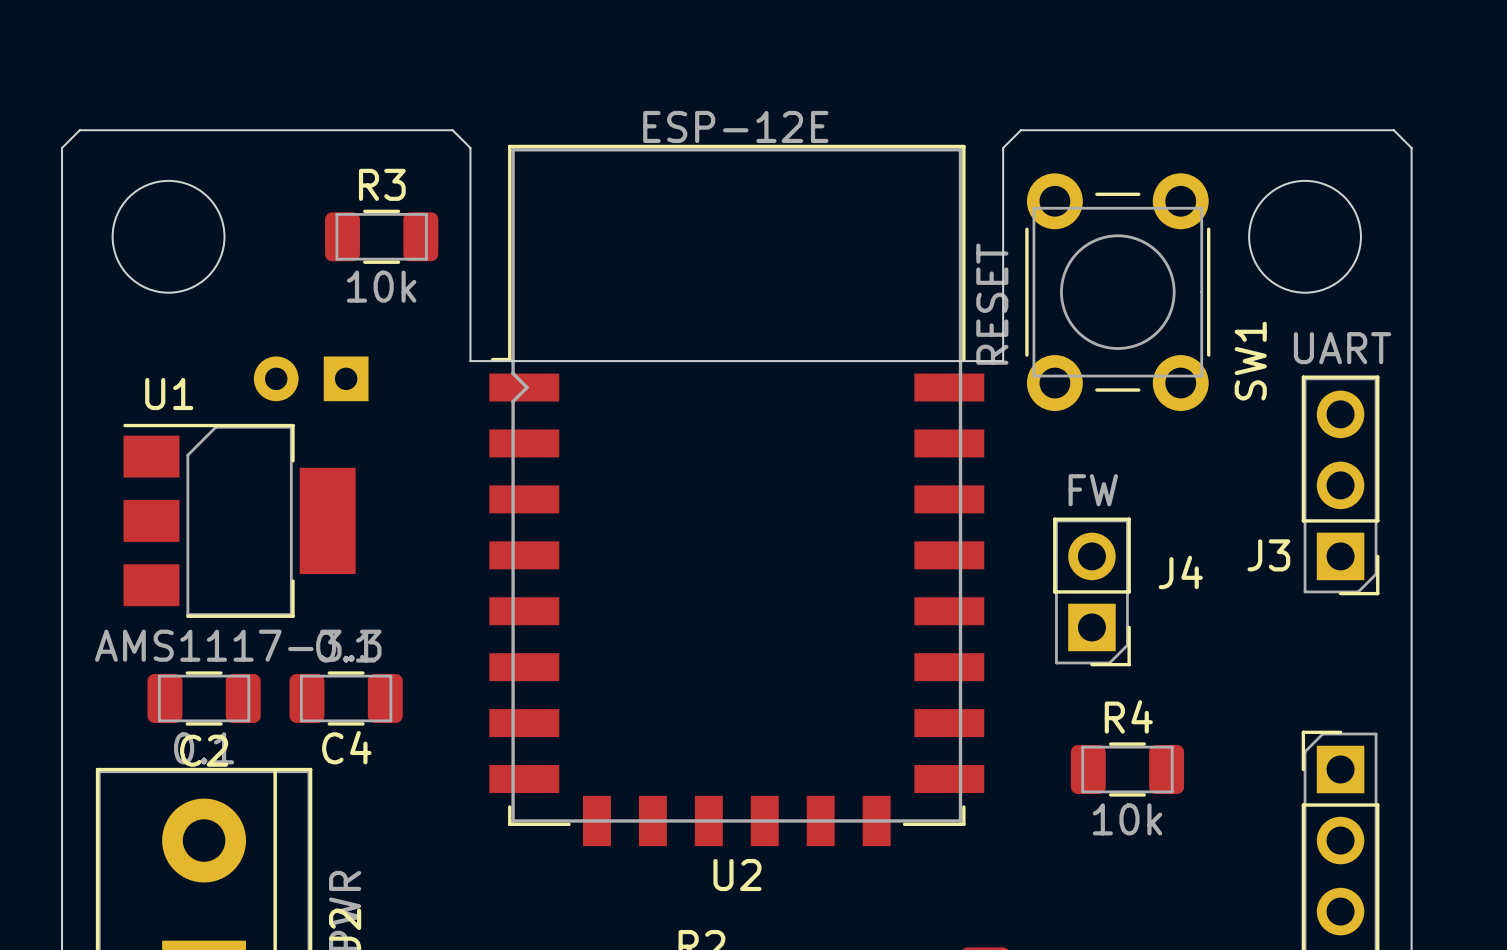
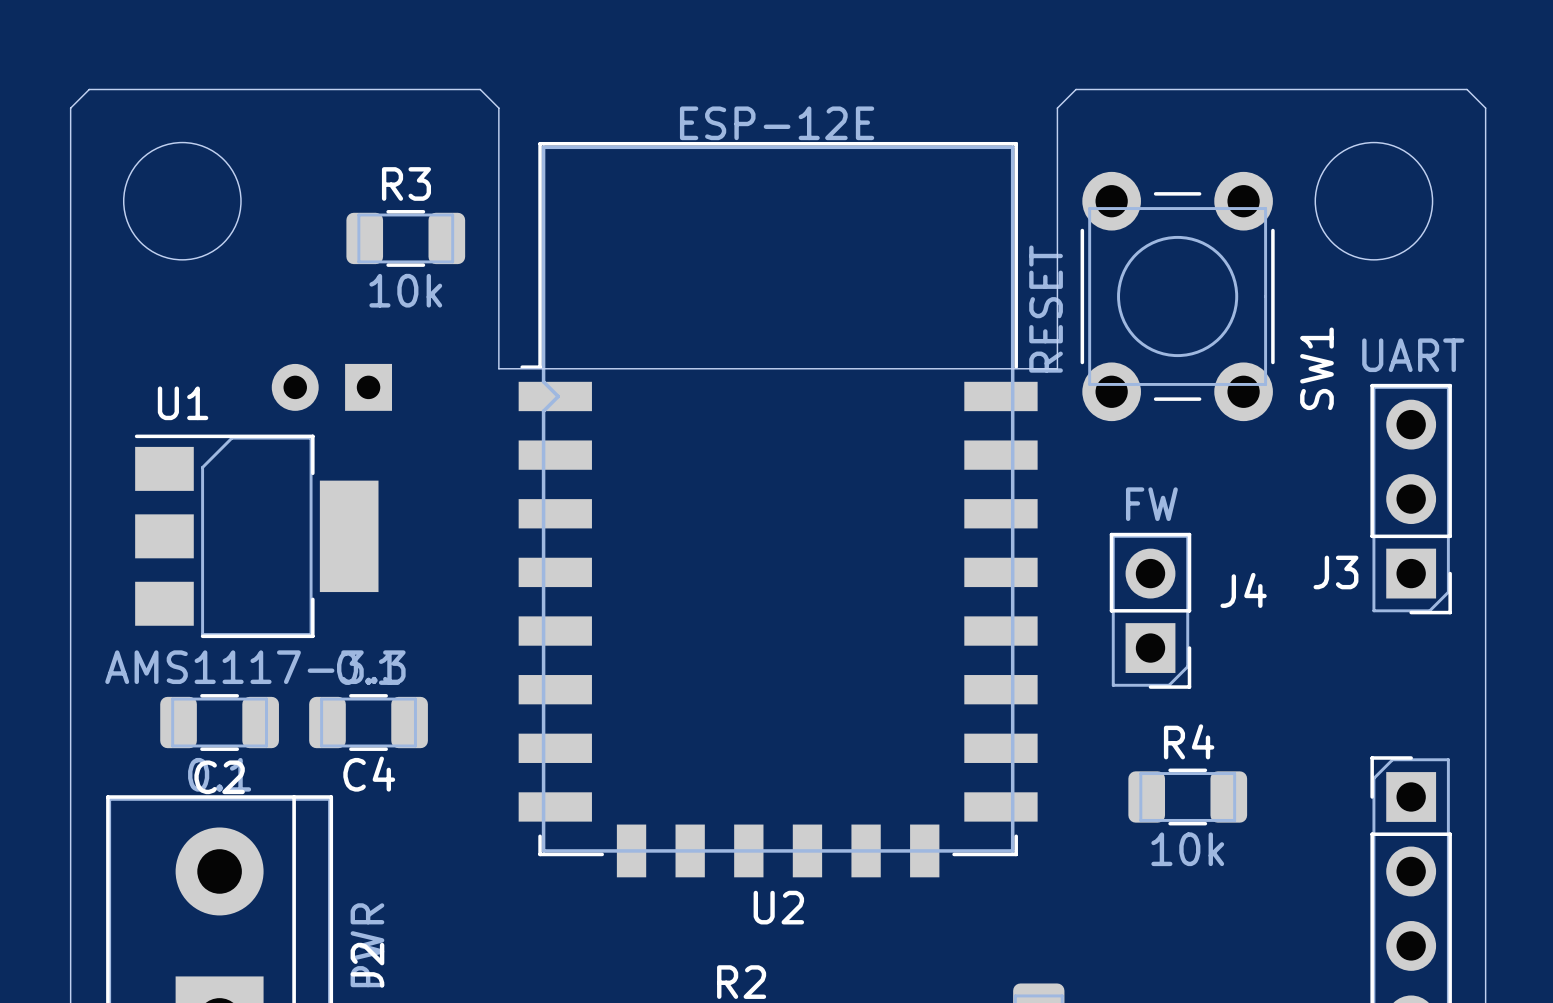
board edge: (62, 148) (79, 130) (452, 130) (470, 148) -> (70, 145) (70, 108) (89, 89) (480, 89) (498, 108) (498, 145)
board edge: (1003, 148) (1020, 130) (1393, 130) (1411, 148) -> (1057, 145) (1057, 108) (1076, 89) (1467, 89) (1485, 108) (1485, 145)
round board edge position: (168, 236) -> (182, 201)
round board edge position: (1305, 236) -> (1373, 201)

